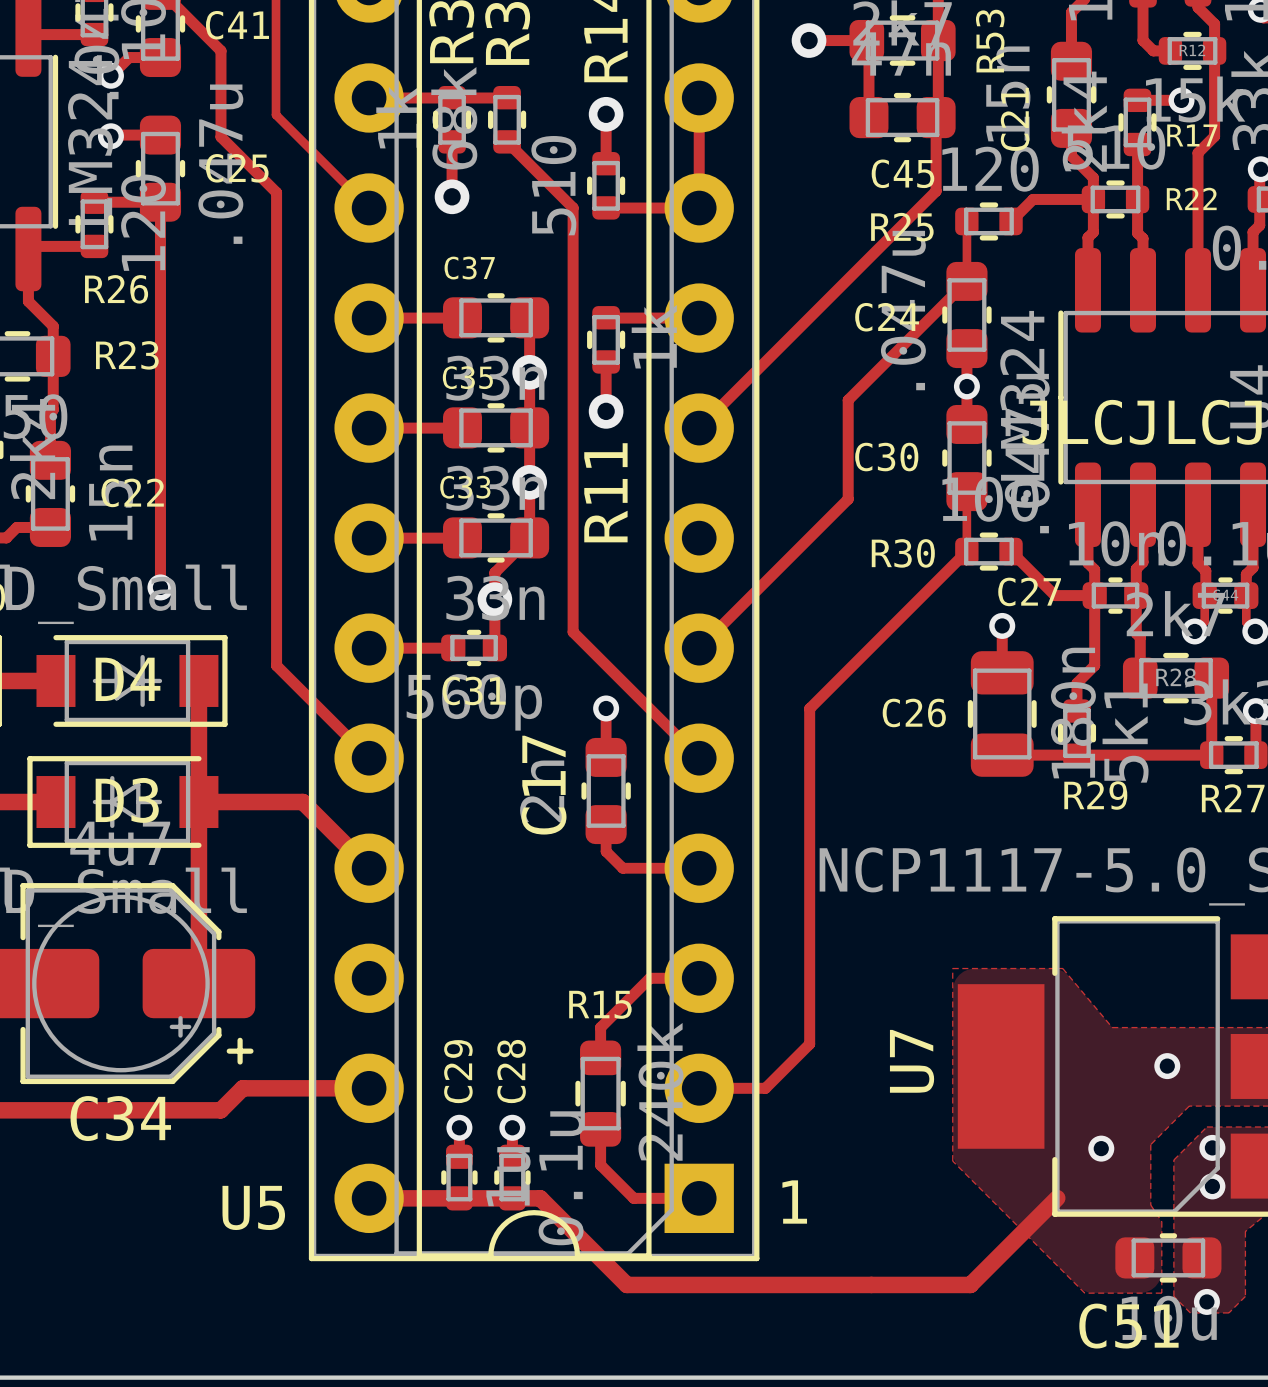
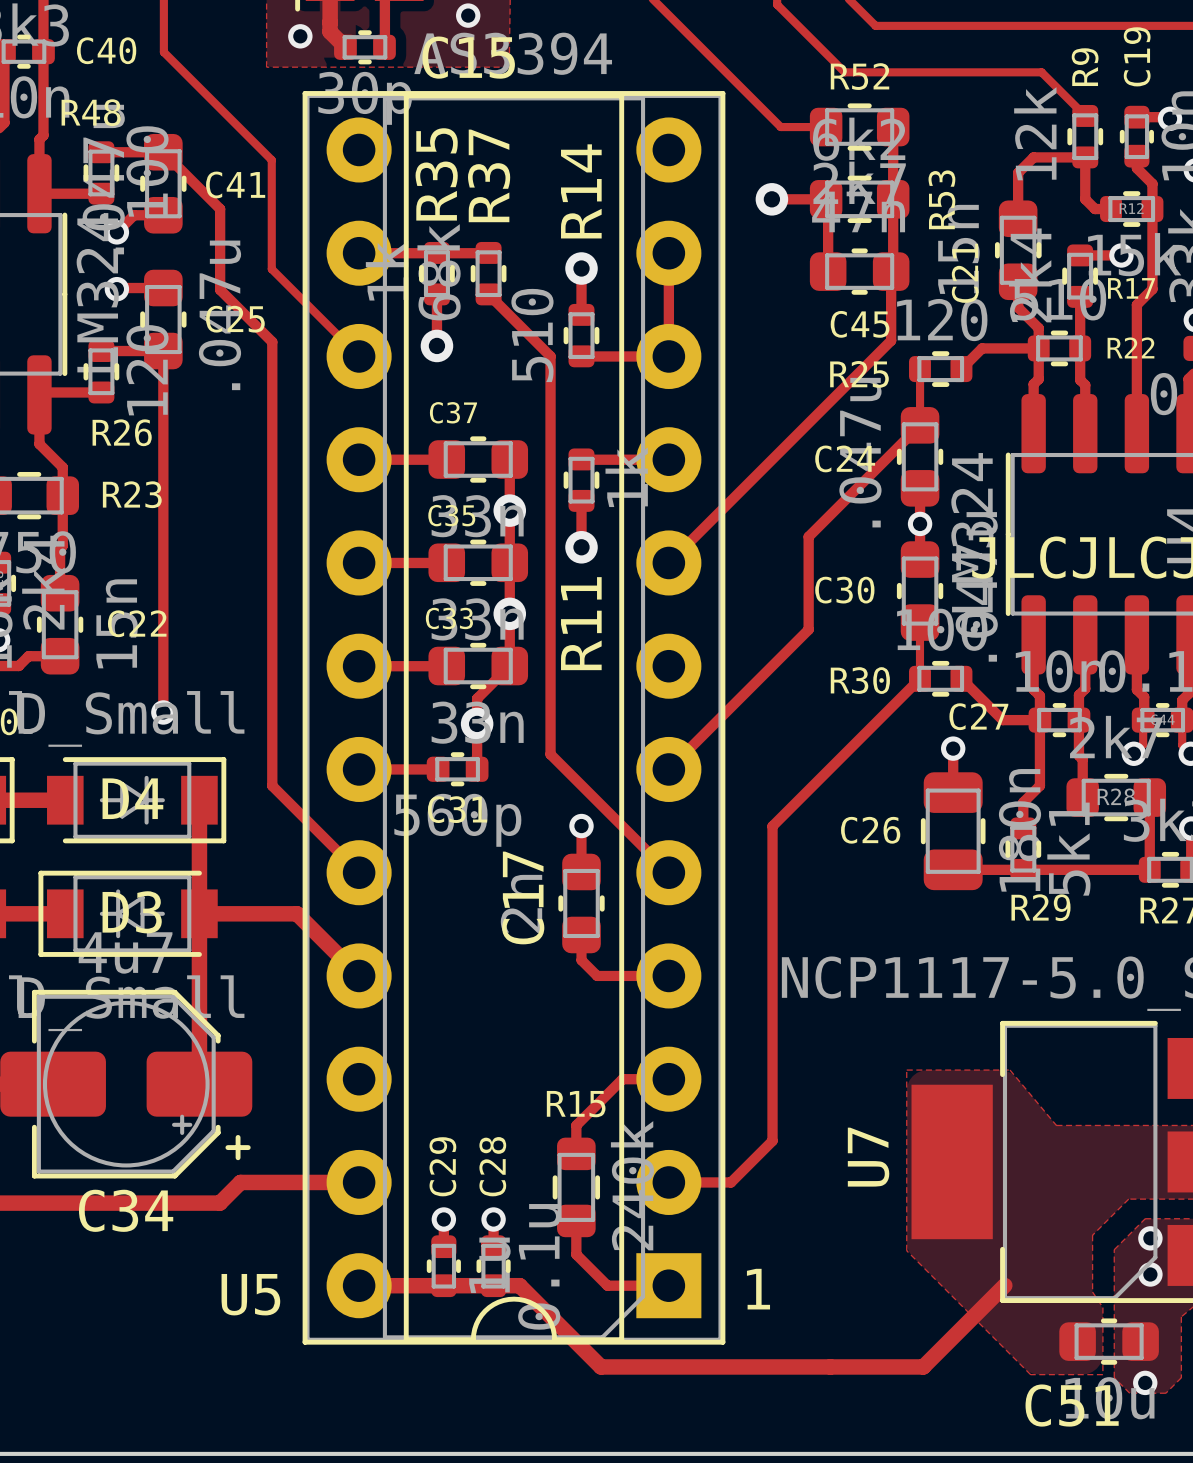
via: (1167, 1066) -> none
via: (1101, 1148) -> none

